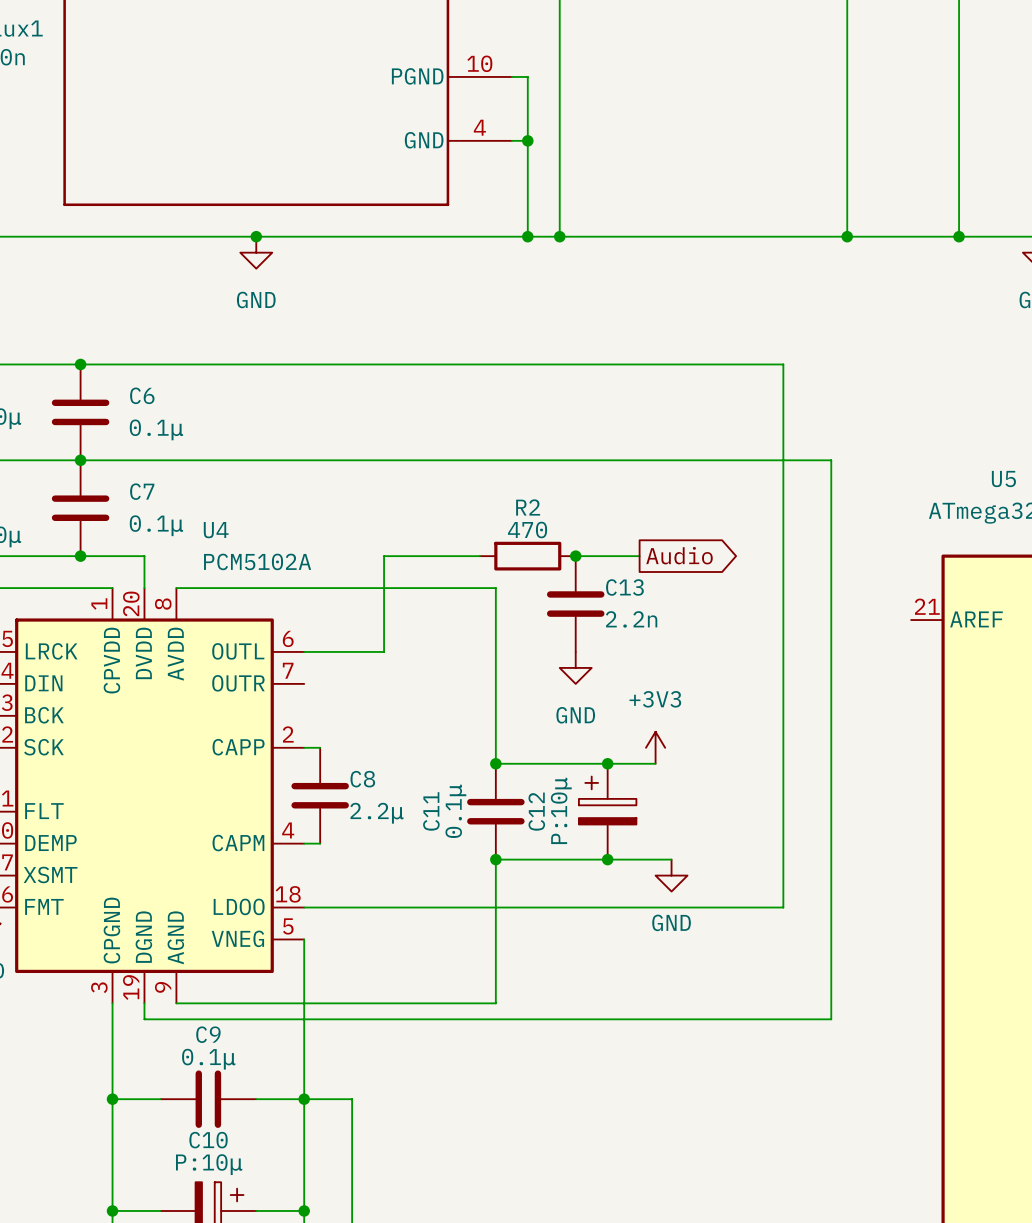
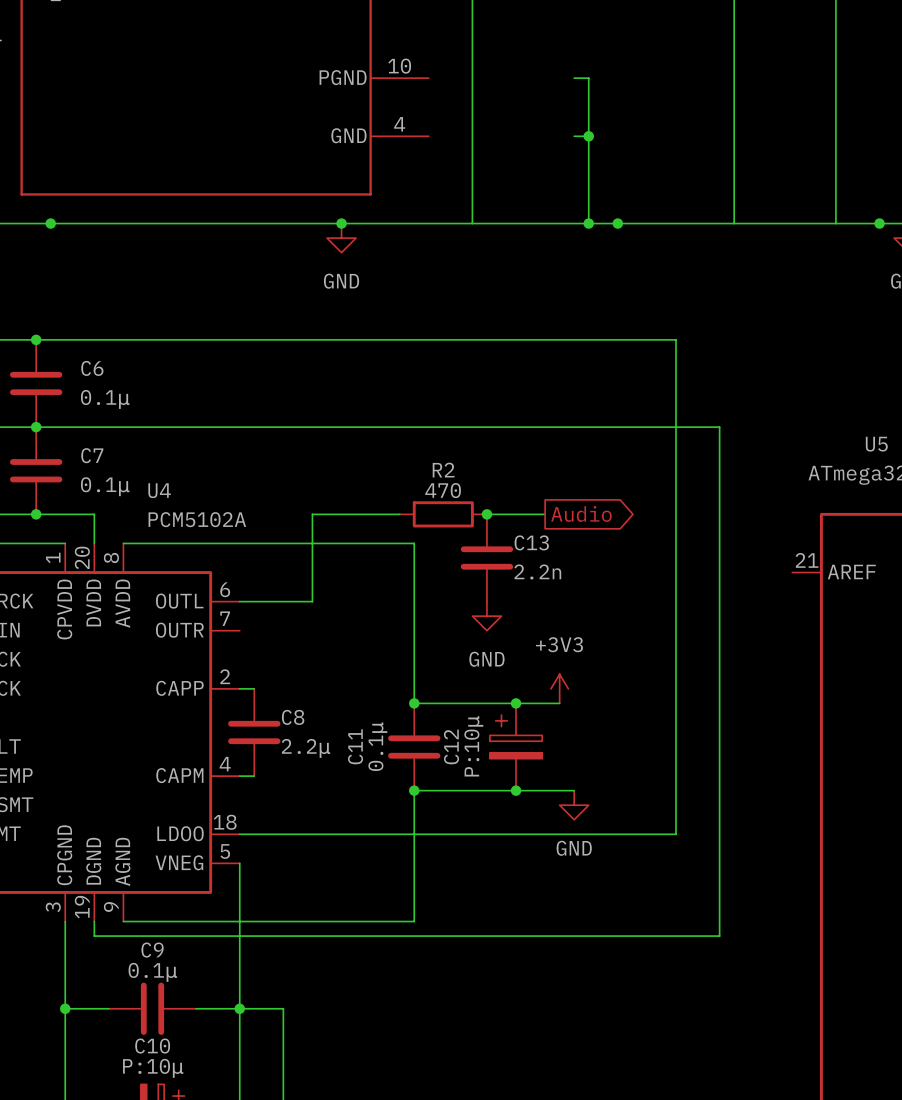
wire: (511, 76) (527, 76) (527, 236) -> (574, 78) (588, 78) (588, 223)
wire: (511, 140) (527, 140) -> (574, 136) (588, 136)
junction: (527, 140) -> none
junction: none -> (588, 136)
junction: none -> (50, 223)
junction: (256, 236) -> none
junction: none -> (341, 223)
junction: (527, 236) -> none
junction: (559, 236) -> none
junction: none -> (588, 223)
junction: none -> (617, 223)
junction: (847, 236) -> none
junction position: (959, 236) -> (879, 223)
power symbol position: GND (256, 252) -> GND (341, 238)

